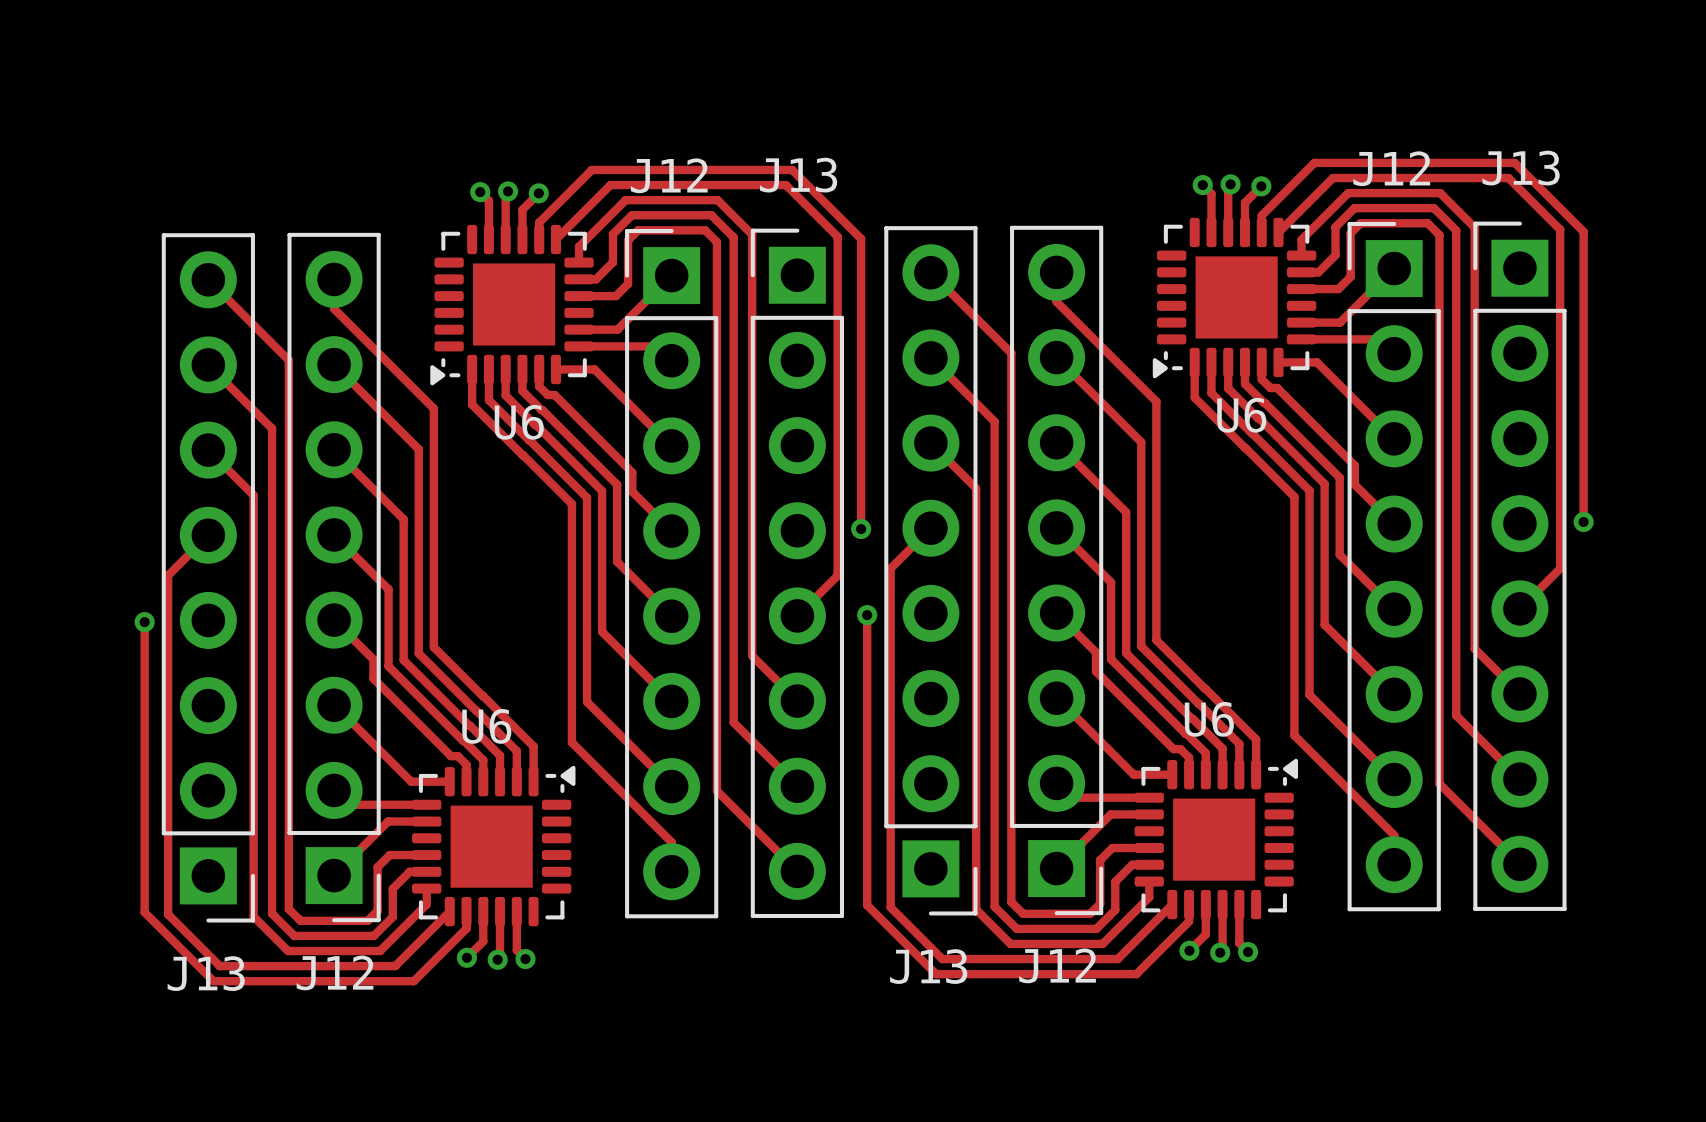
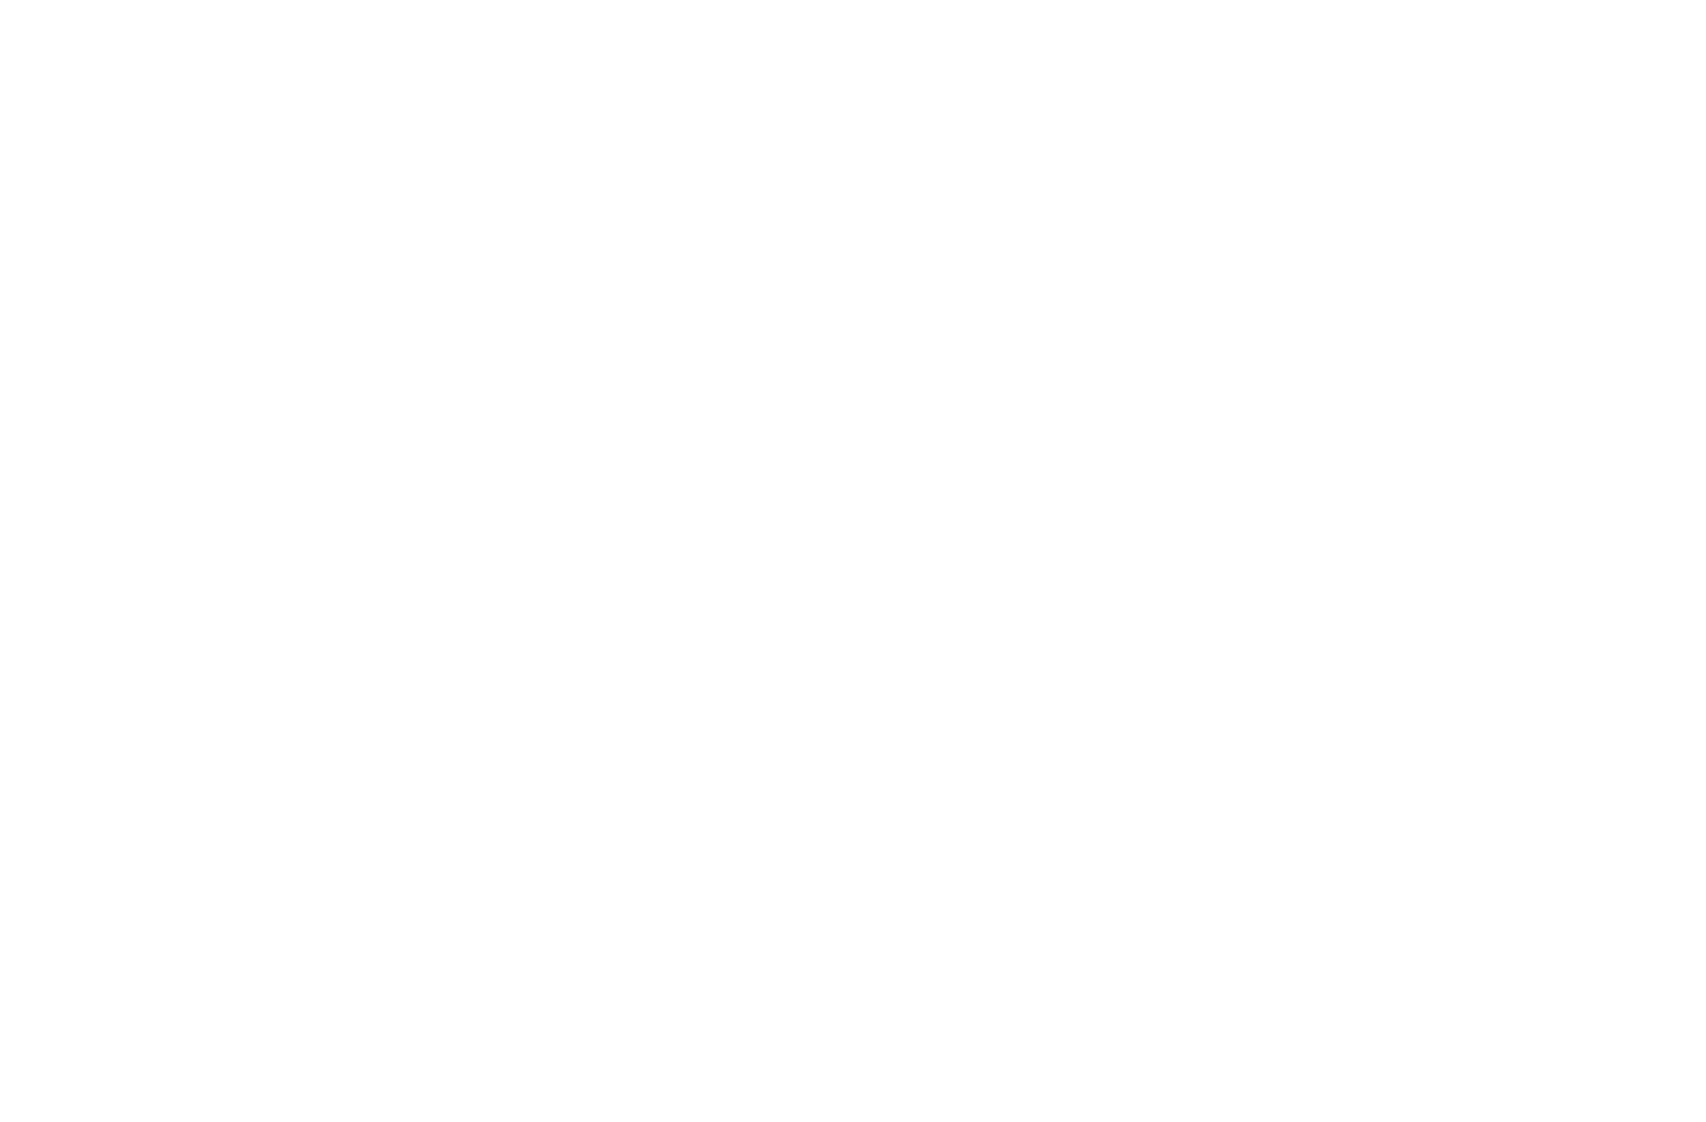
track: (1230, 184) (1228, 186) (1228, 232) -> none
via: (1230, 184) -> none
track: (1202, 185) (1211, 193) (1211, 232) -> none
via: (1202, 185) -> none
track: (1261, 186) (1244, 202) (1244, 232) -> none
via: (1261, 186) -> none
track: (508, 191) (505, 193) (505, 239) -> none
via: (508, 191) -> none
track: (480, 192) (488, 200) (488, 239) -> none
via: (480, 192) -> none
track: (538, 193) (522, 209) (522, 239) -> none
via: (538, 193) -> none
track: (1261, 232) (1261, 215) (1314, 162) (1514, 162) (1583, 231) (1583, 523) -> none
track: (1278, 232) (1333, 178) (1508, 178) (1560, 229) (1560, 568) (1519, 608) -> none
track: (539, 239) (539, 222) (591, 169) (792, 169) (861, 238) (861, 530) -> none
track: (555, 239) (610, 185) (785, 185) (837, 236) (837, 575) (797, 615) -> none
track: (1301, 255) (1301, 239) (1348, 193) (1440, 193) (1474, 227) (1474, 648) (1519, 694) -> none
track: (579, 262) (579, 246) (625, 200) (717, 200) (752, 234) (752, 655) (797, 701) -> none
track: (1394, 268) (1340, 322) (1301, 322) -> none
track: (930, 272) (1011, 353) (1011, 902) (1023, 913) (1090, 913) (1100, 903) (1100, 860) (1112, 848) (1149, 848) -> none
track: (1056, 272) (1056, 301) (1156, 401) (1156, 640) (1204, 688) -> none
track: (1301, 272) (1318, 272) (1335, 255) (1335, 227) (1354, 208) (1433, 208) (1456, 230) (1456, 715) (1519, 779) -> none
track: (671, 275) (617, 329) (579, 329) -> none
track: (208, 279) (288, 360) (288, 909) (300, 920) (367, 920) (377, 910) (377, 867) (389, 855) (426, 855) -> none
track: (334, 279) (334, 308) (433, 408) (433, 647) (482, 695) -> none
track: (579, 279) (595, 279) (612, 262) (612, 234) (631, 215) (711, 215) (733, 237) (733, 722) (797, 786) -> none
track: (1301, 289) (1338, 289) (1350, 276) (1350, 233) (1360, 223) (1427, 223) (1439, 235) (1439, 783) (1519, 864) -> none
track: (579, 296) (615, 296) (628, 283) (628, 240) (638, 230) (705, 230) (716, 242) (716, 790) (797, 871) -> none
U6: (1234, 298) -> none
U6: (511, 305) -> none
track: (1301, 339) (1379, 339) (1394, 353) -> none
track: (579, 346) (657, 346) (671, 360) -> none
track: (930, 357) (994, 421) (994, 906) (1016, 928) (1096, 928) (1115, 909) (1115, 881) (1132, 864) (1149, 864) -> none
track: (1056, 357) (1141, 442) (1141, 646) (1198, 703) -> none
track: (1194, 362) (1194, 397) (1245, 448) -> none
track: (1211, 362) (1211, 393) (1251, 433) -> none
track: (1228, 362) (1228, 388) (1324, 483) (1324, 624) (1394, 694) -> none
track: (1244, 362) (1244, 383) (1339, 477) (1339, 554) (1394, 609) -> none
track: (1261, 362) (1261, 379) (1270, 387) (1277, 387) (1354, 465) (1354, 484) (1394, 524) -> none
track: (1278, 362) (1317, 362) (1393, 438) -> none
track: (208, 364) (272, 428) (272, 913) (294, 935) (373, 935) (392, 917) (392, 888) (409, 871) (426, 871) -> none
track: (334, 364) (418, 449) (418, 653) (476, 710) -> none
track: (472, 369) (472, 404) (522, 455) -> none
track: (488, 369) (488, 400) (529, 440) -> none
track: (505, 369) (505, 395) (602, 491) (602, 631) (671, 701) -> none
track: (522, 369) (522, 390) (617, 484) (617, 561) (671, 616) -> none
track: (539, 369) (539, 386) (547, 395) (554, 395) (632, 472) (632, 491) (671, 531) -> none
track: (555, 369) (594, 369) (670, 445) -> none
track: (1252, 433) (1309, 490) (1309, 694) (1394, 779) -> none
track: (529, 440) (587, 497) (587, 701) (671, 786) -> none
track: (1056, 442) (1126, 512) (1126, 653) (1222, 748) (1222, 774) -> none
track: (930, 443) (976, 488) (976, 909) (1010, 943) (1102, 943) (1149, 897) (1149, 881) -> none
track: (1245, 448) (1294, 496) (1294, 735) (1394, 835) (1394, 864) -> none
track: (334, 449) (403, 519) (403, 660) (500, 755) (500, 781) -> none
track: (208, 450) (253, 495) (253, 916) (288, 951) (380, 951) (426, 904) (426, 888) -> none
track: (523, 455) (571, 503) (571, 742) (671, 842) (671, 871) -> none
via: (1583, 522) -> none
track: (1056, 527) (1111, 582) (1111, 659) (1205, 753) (1205, 774) -> none
track: (930, 528) (890, 568) (890, 907) (942, 959) (1117, 959) (1172, 904) -> none
via: (861, 529) -> none
track: (334, 534) (388, 589) (388, 666) (483, 760) (483, 781) -> none
track: (208, 535) (168, 575) (168, 914) (219, 966) (395, 966) (449, 911) -> none
J12: (1394, 566) -> none
J13: (1519, 566) -> none
J13: (930, 570) -> none
J12: (1056, 570) -> none
J12: (671, 573) -> none
J13: (797, 573) -> none
J13: (208, 577) -> none
J12: (334, 577) -> none
track: (867, 613) (867, 905) (936, 974) (1136, 974) (1189, 921) (1189, 904) -> none
track: (1056, 613) (1096, 652) (1096, 671) (1173, 749) (1180, 749) (1189, 757) (1189, 774) -> none
via: (867, 615) -> none
track: (144, 620) (144, 912) (213, 981) (413, 981) (466, 928) (466, 911) -> none
track: (334, 620) (373, 659) (373, 678) (451, 756) (457, 756) (466, 764) (466, 781) -> none
via: (144, 622) -> none
track: (1205, 688) (1256, 739) (1256, 774) -> none
track: (482, 695) (533, 746) (533, 781) -> none
track: (1057, 698) (1133, 774) (1172, 774) -> none
track: (1199, 703) (1239, 744) (1239, 774) -> none
track: (334, 705) (411, 781) (449, 781) -> none
track: (476, 710) (516, 751) (516, 781) -> none
track: (1056, 783) (1070, 797) (1149, 797) -> none
track: (334, 790) (348, 804) (426, 804) -> none
track: (1149, 814) (1110, 814) (1056, 868) -> none
track: (426, 821) (388, 821) (334, 875) -> none
U6: (1216, 839) -> none
U6: (493, 846) -> none
track: (1205, 904) (1205, 934) (1189, 950) -> none
track: (1222, 904) (1222, 950) (1220, 952) -> none
track: (1239, 904) (1239, 943) (1248, 952) -> none
track: (483, 911) (483, 941) (466, 957) -> none
track: (500, 911) (500, 957) (497, 959) -> none
track: (516, 911) (516, 950) (525, 959) -> none
via: (1189, 950) -> none
via: (1220, 952) -> none
via: (1248, 952) -> none
via: (466, 957) -> none
via: (497, 959) -> none
via: (525, 959) -> none

